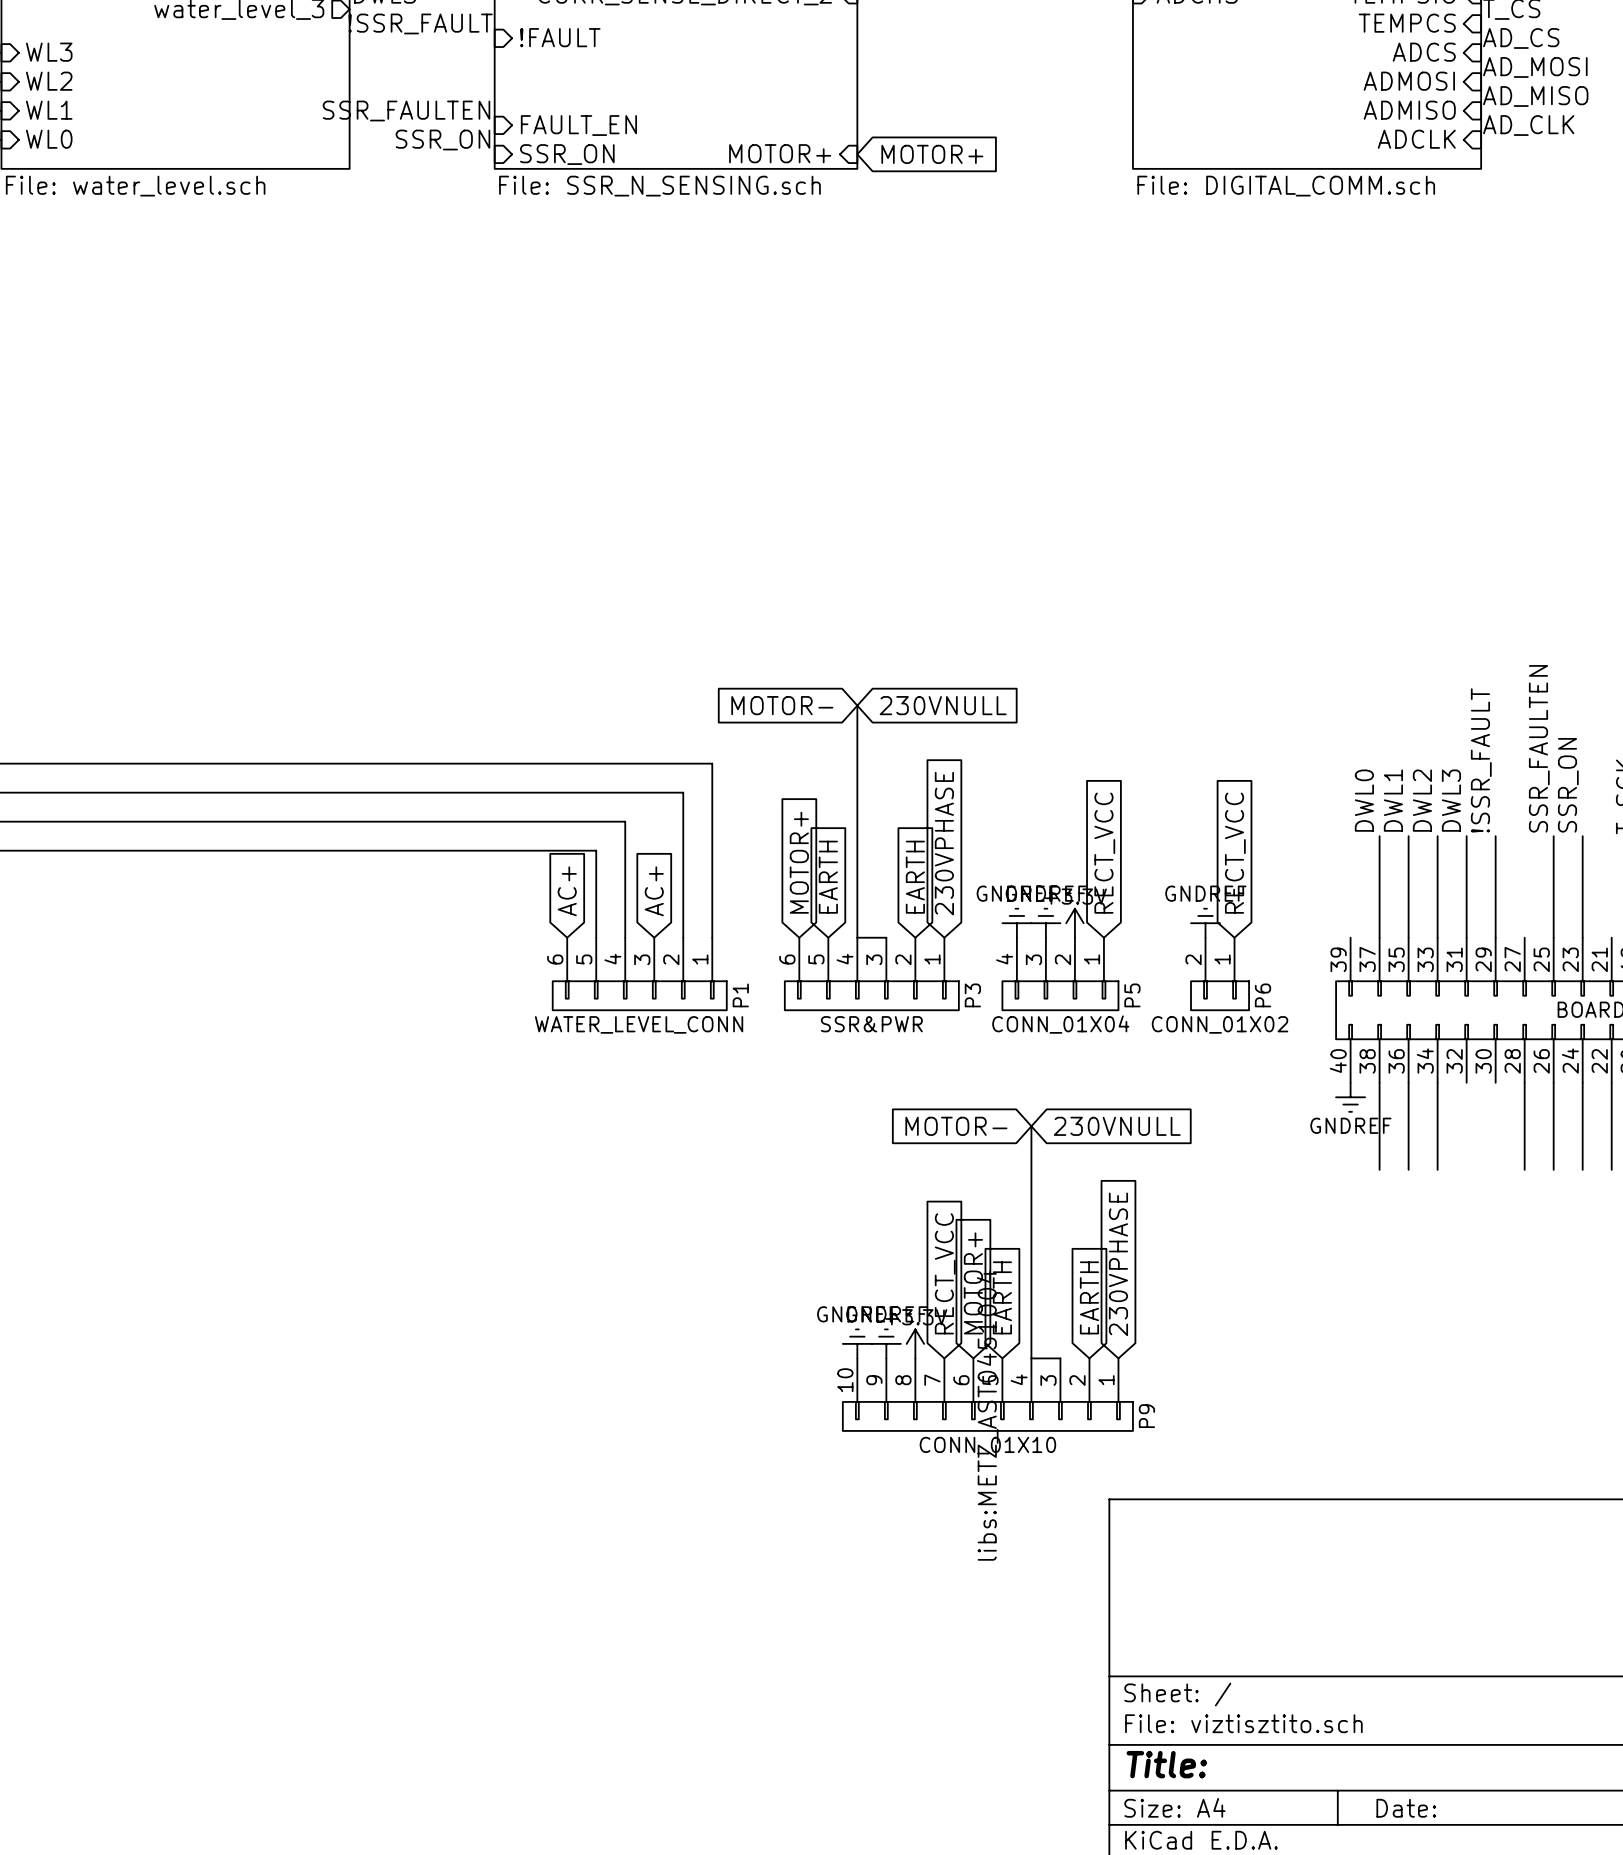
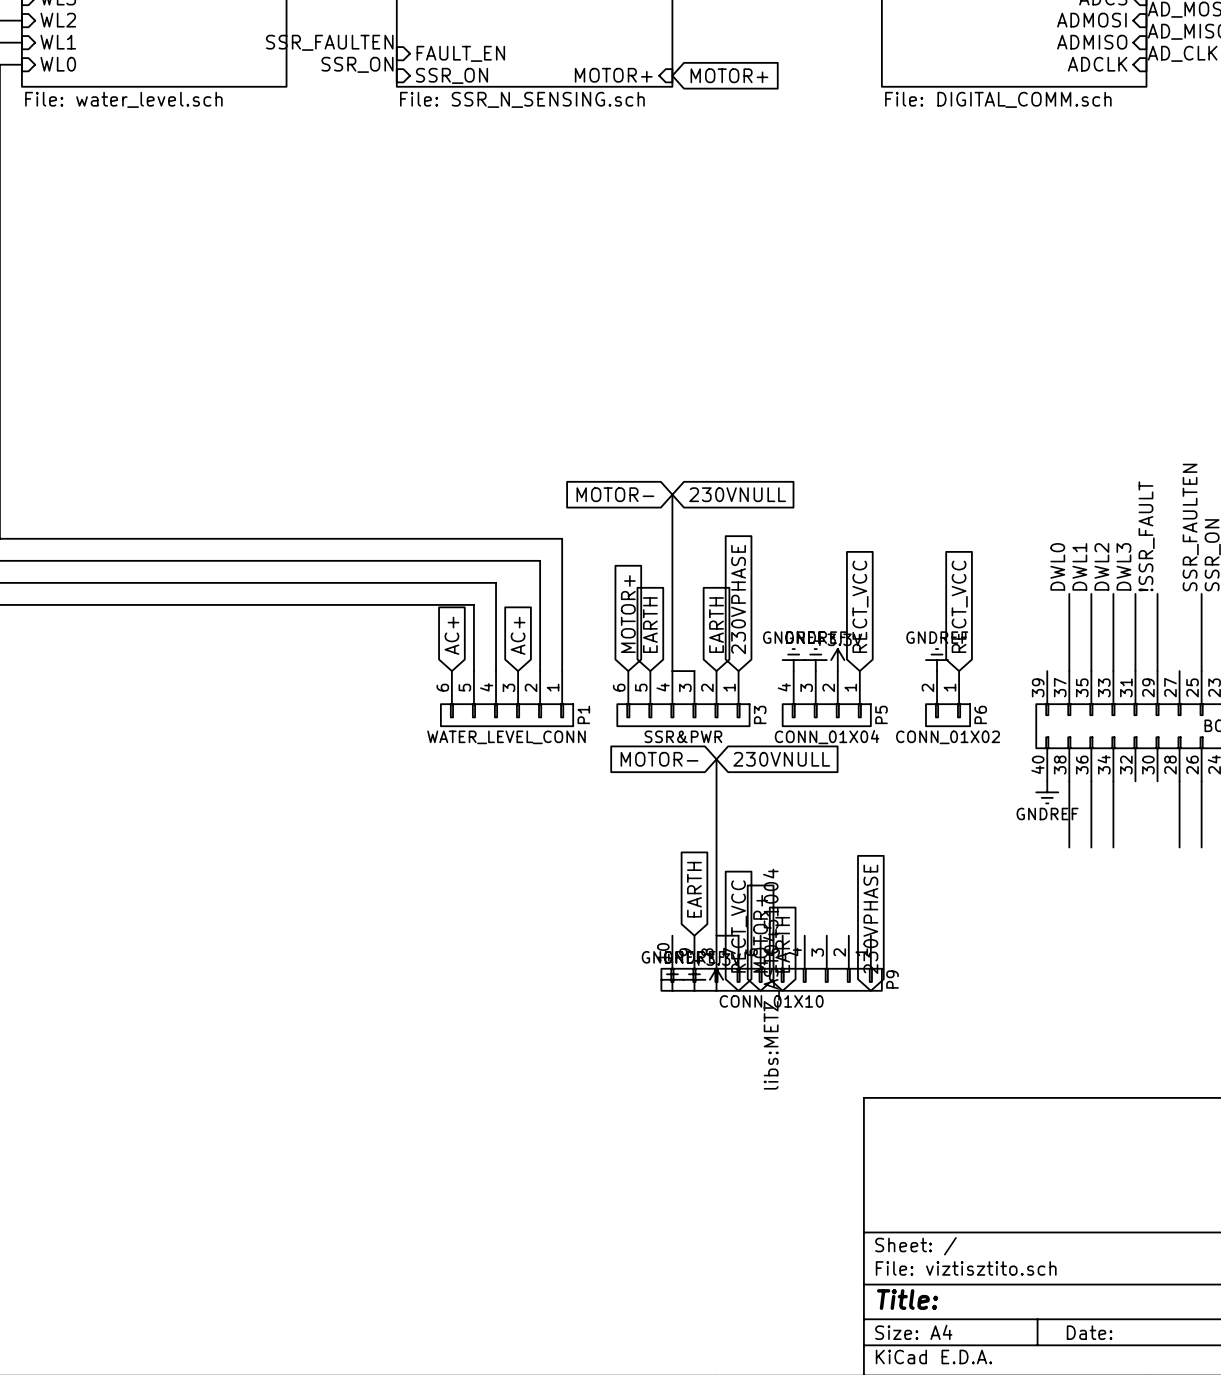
global label position: MOTOR- (956, 1126) -> MOTOR- (659, 759)
wire: (1031, 1126) (1031, 1358) (1060, 1358) -> (716, 759) (716, 935) (738, 935)
global label position: 230VNULL (1117, 1126) -> 230VNULL (781, 759)
global label position: EARTH (1089, 1297) -> EARTH (694, 889)
P9 position: (987, 1394) -> (771, 963)

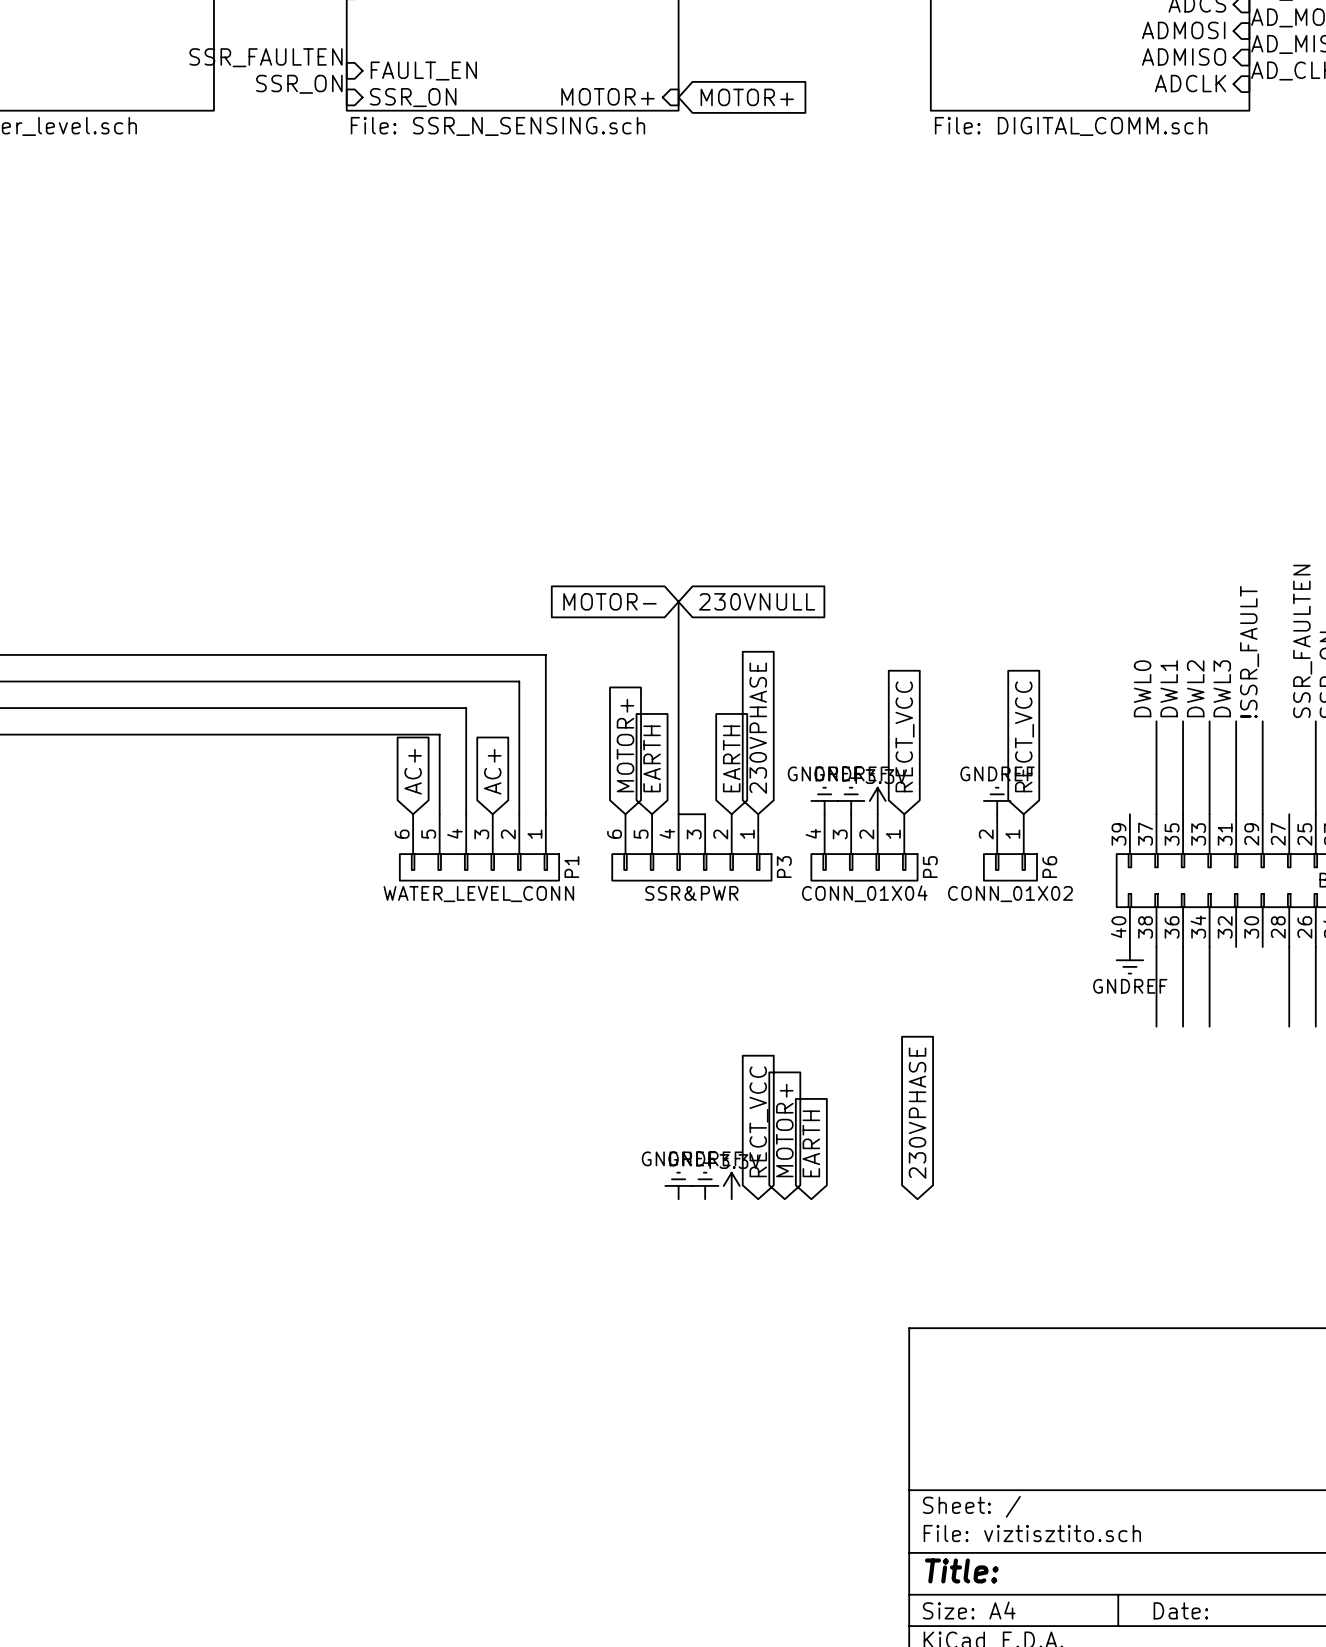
global label: MOTOR- (659, 759) -> none
wire: (716, 759) (716, 935) (738, 935) -> none
global label: 230VNULL (781, 759) -> none
global label: EARTH (694, 889) -> none
P9: CONN_01X10 (771, 963) -> none

